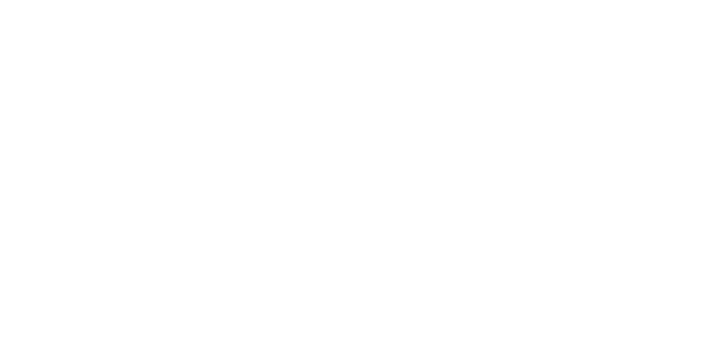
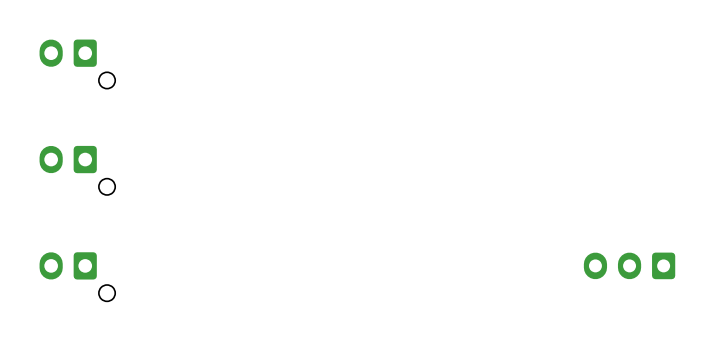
part: none -> (77, 64)
part: none -> (77, 170)
part: none -> (629, 265)
part: none -> (77, 276)

